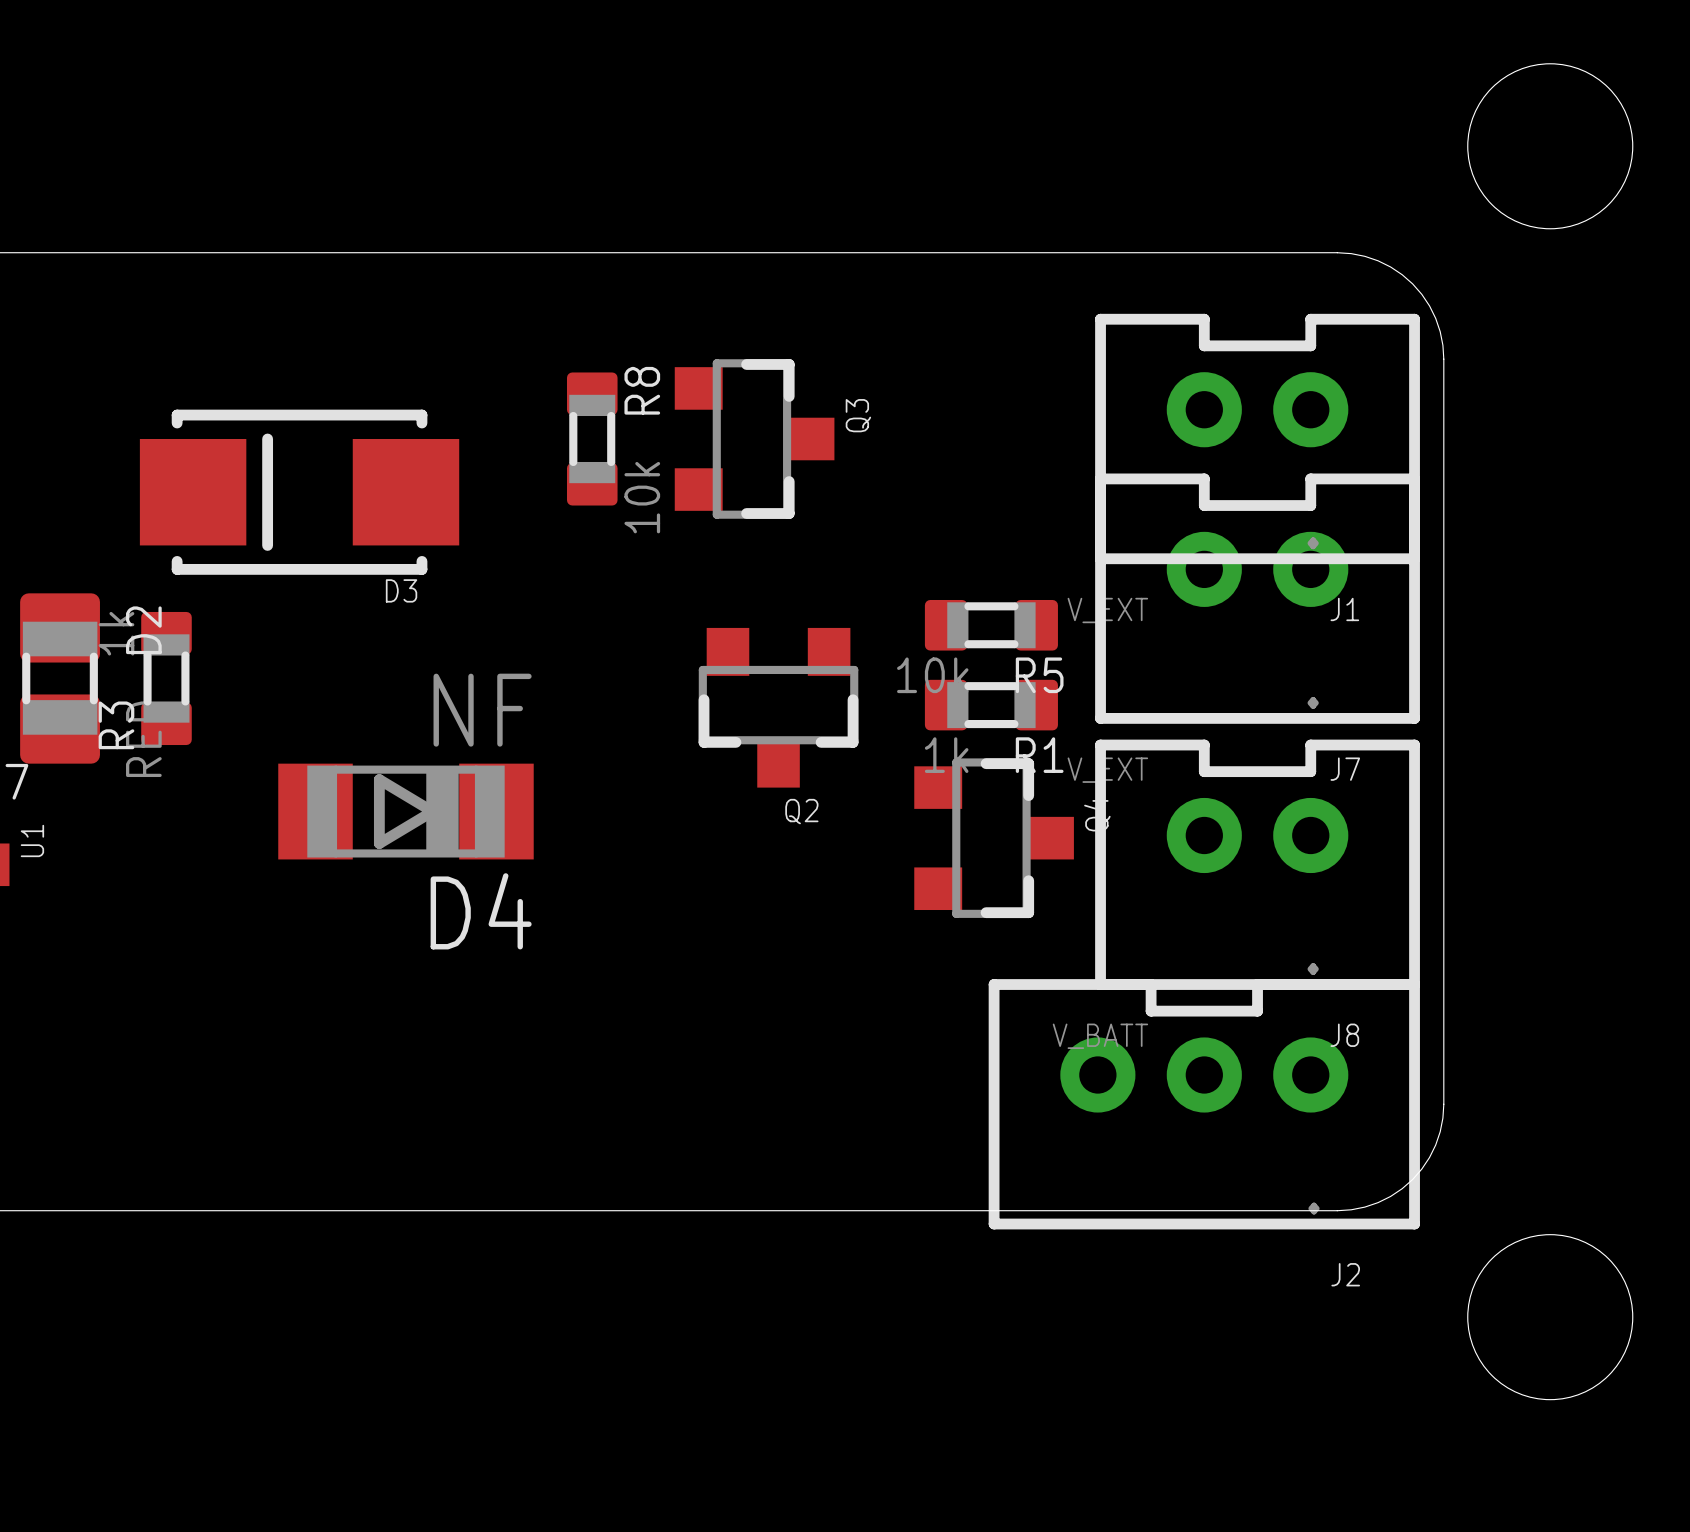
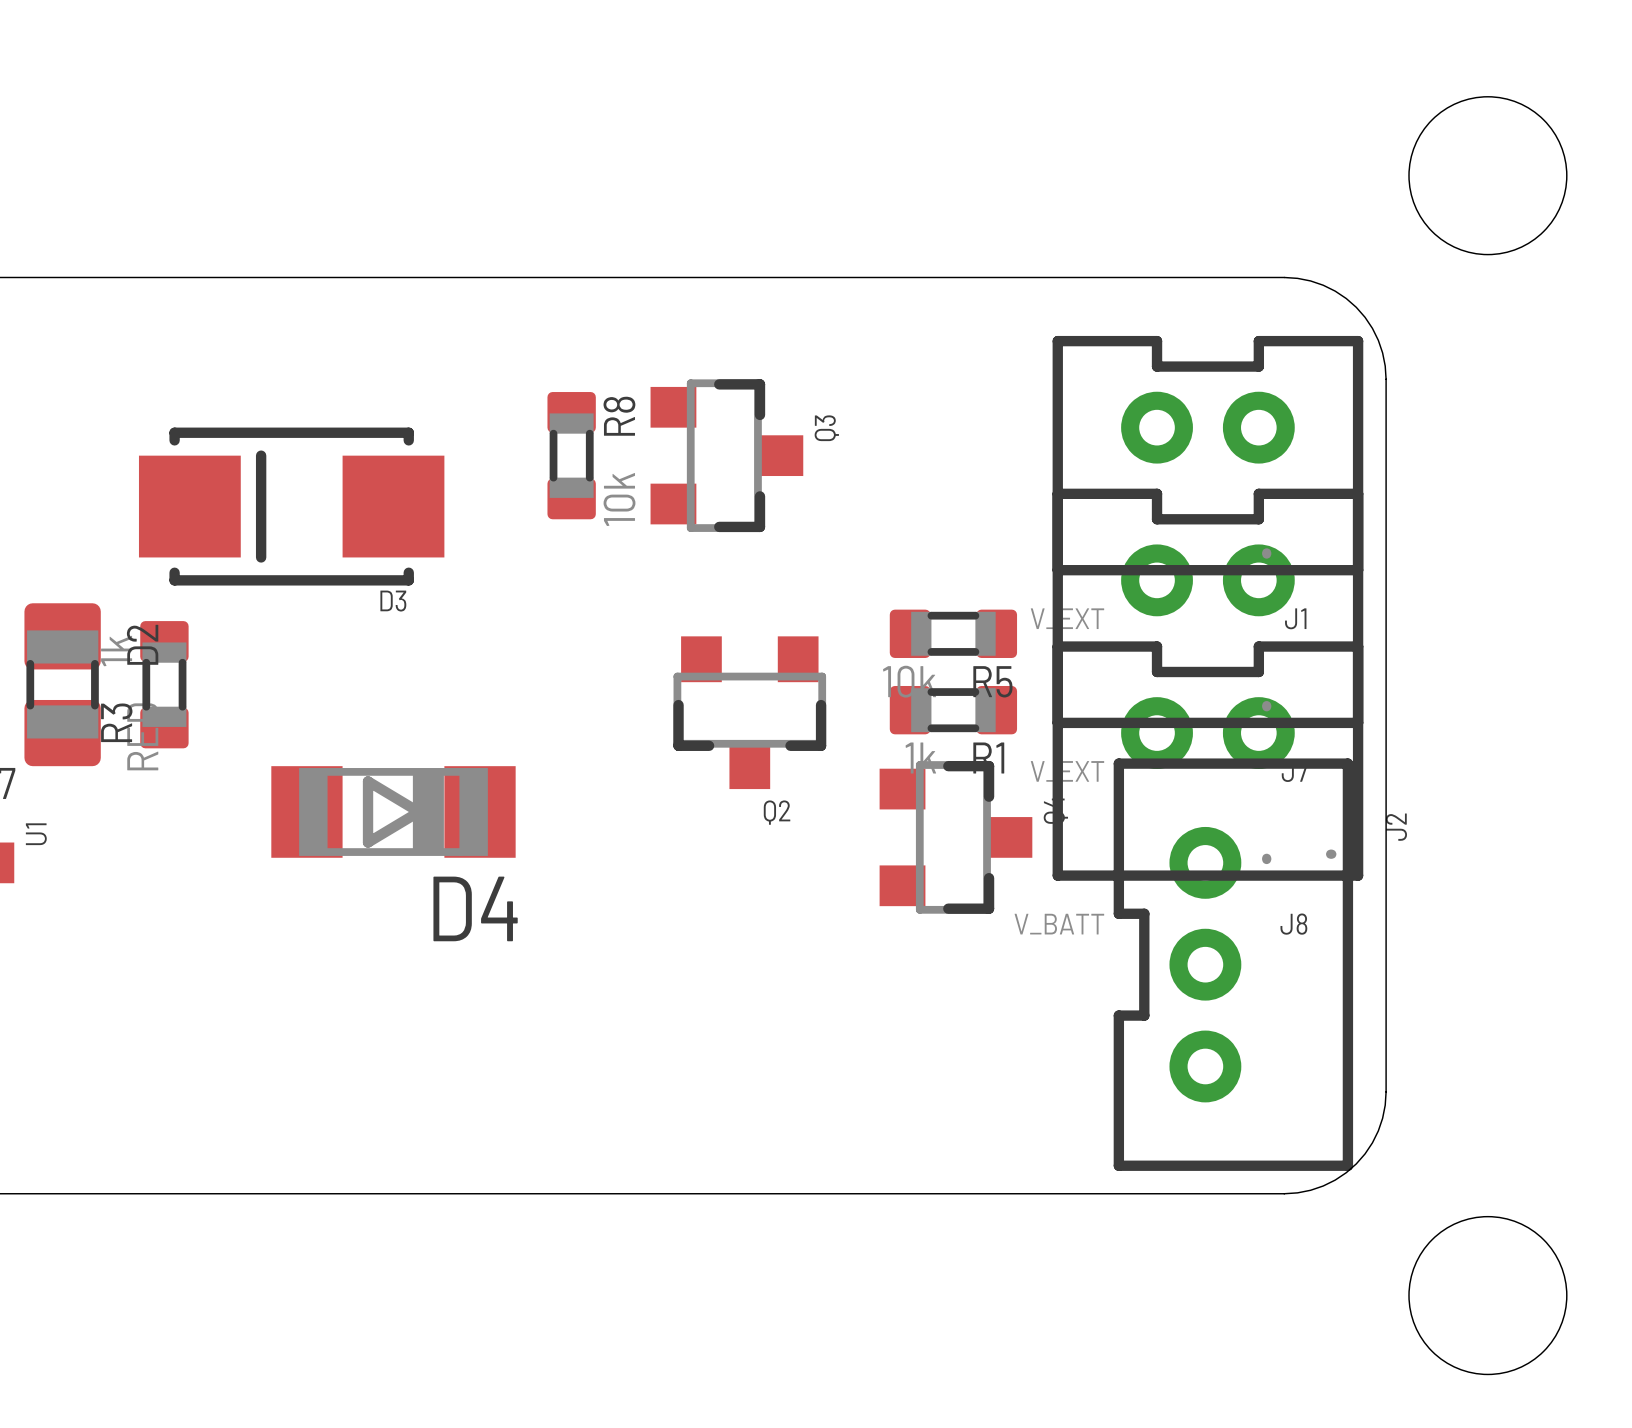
D4 value: NF (482, 710) -> none
J8 position: (1257, 864) -> (1207, 761)
J2 rotation: 0° (1204, 1104) -> 90° counterclockwise (1233, 964)

